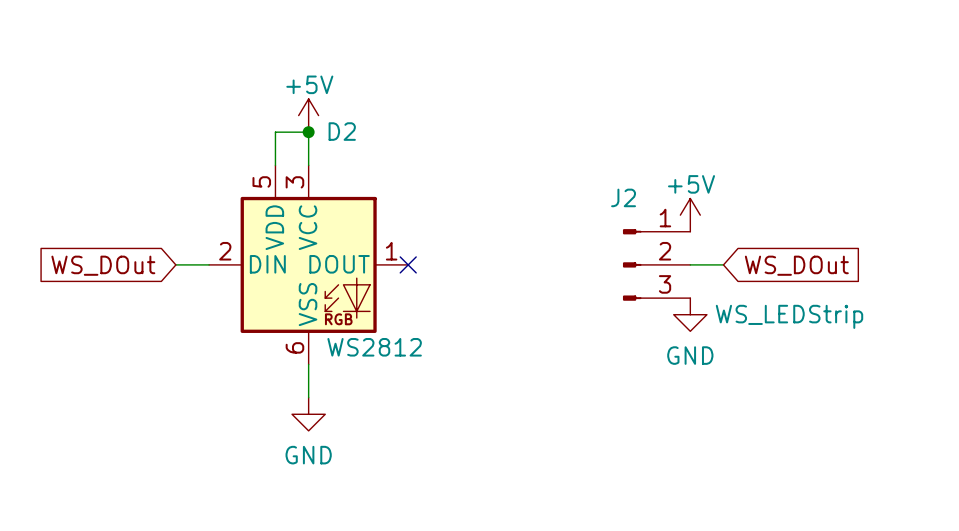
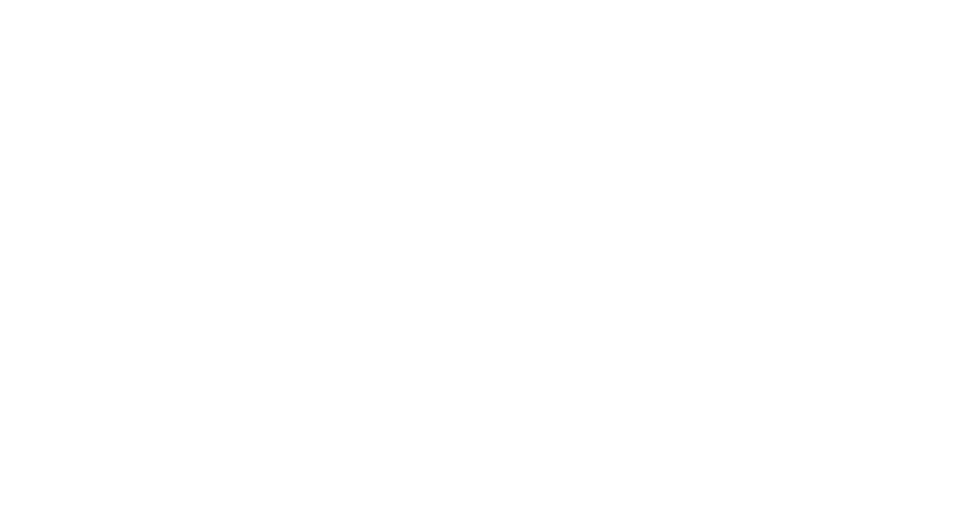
power symbol: +5V (308, 115) -> none
junction: (308, 132) -> none
wire: (275, 165) (275, 132) (308, 132) (308, 165) -> none
power symbol: +5V (690, 215) -> none
wire: (175, 264) (209, 264) -> none
D2: WS2812 (308, 264) -> none
no-connect mark: (408, 264) -> none
J2: WS_LEDStrip (656, 264) -> none
wire: (690, 264) (723, 264) -> none
global label: WS_DOut (103, 265) -> none
global label: WS_DOut (796, 265) -> none
power symbol: GND (690, 314) -> none
wire: (308, 364) (308, 397) -> none
power symbol: GND (308, 414) -> none

